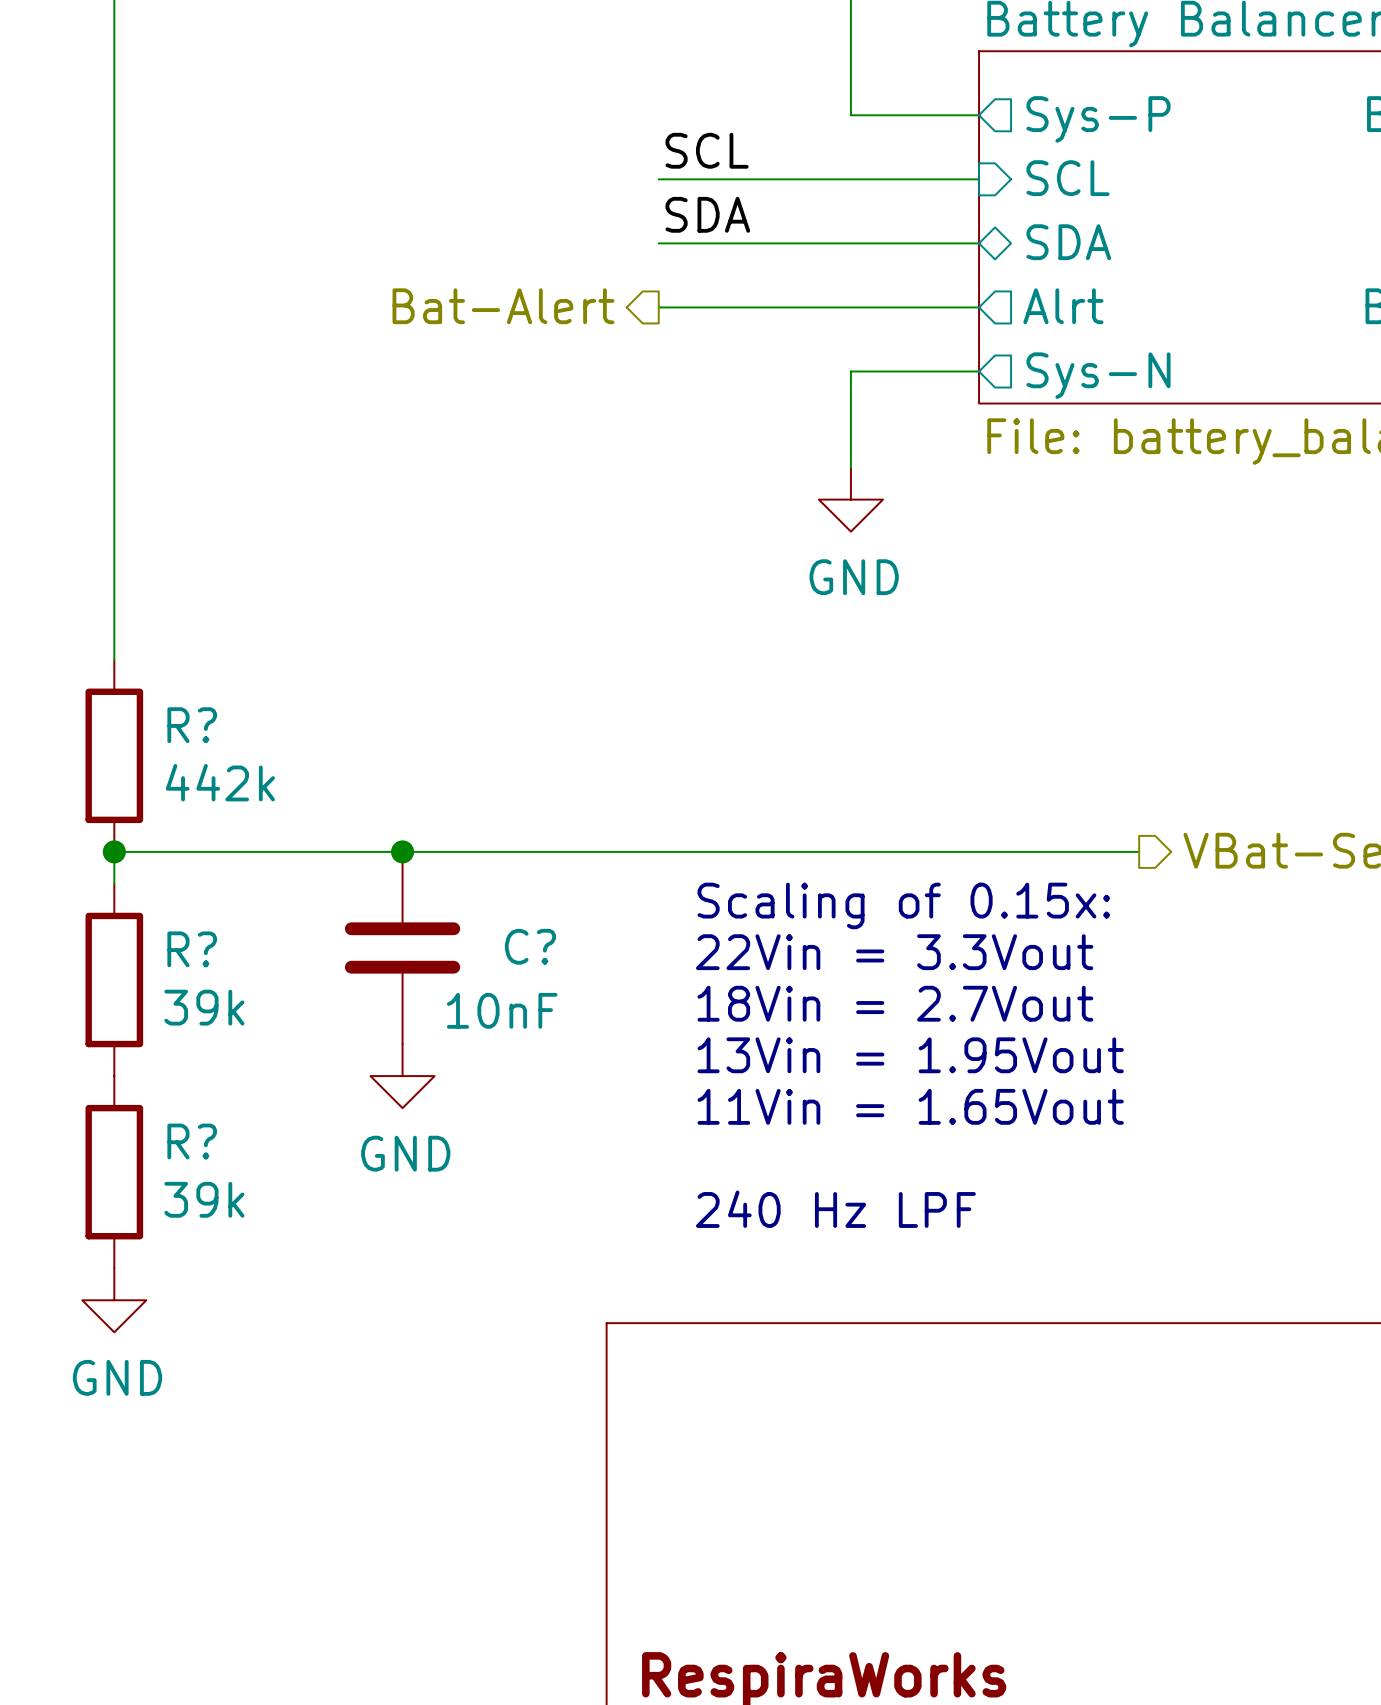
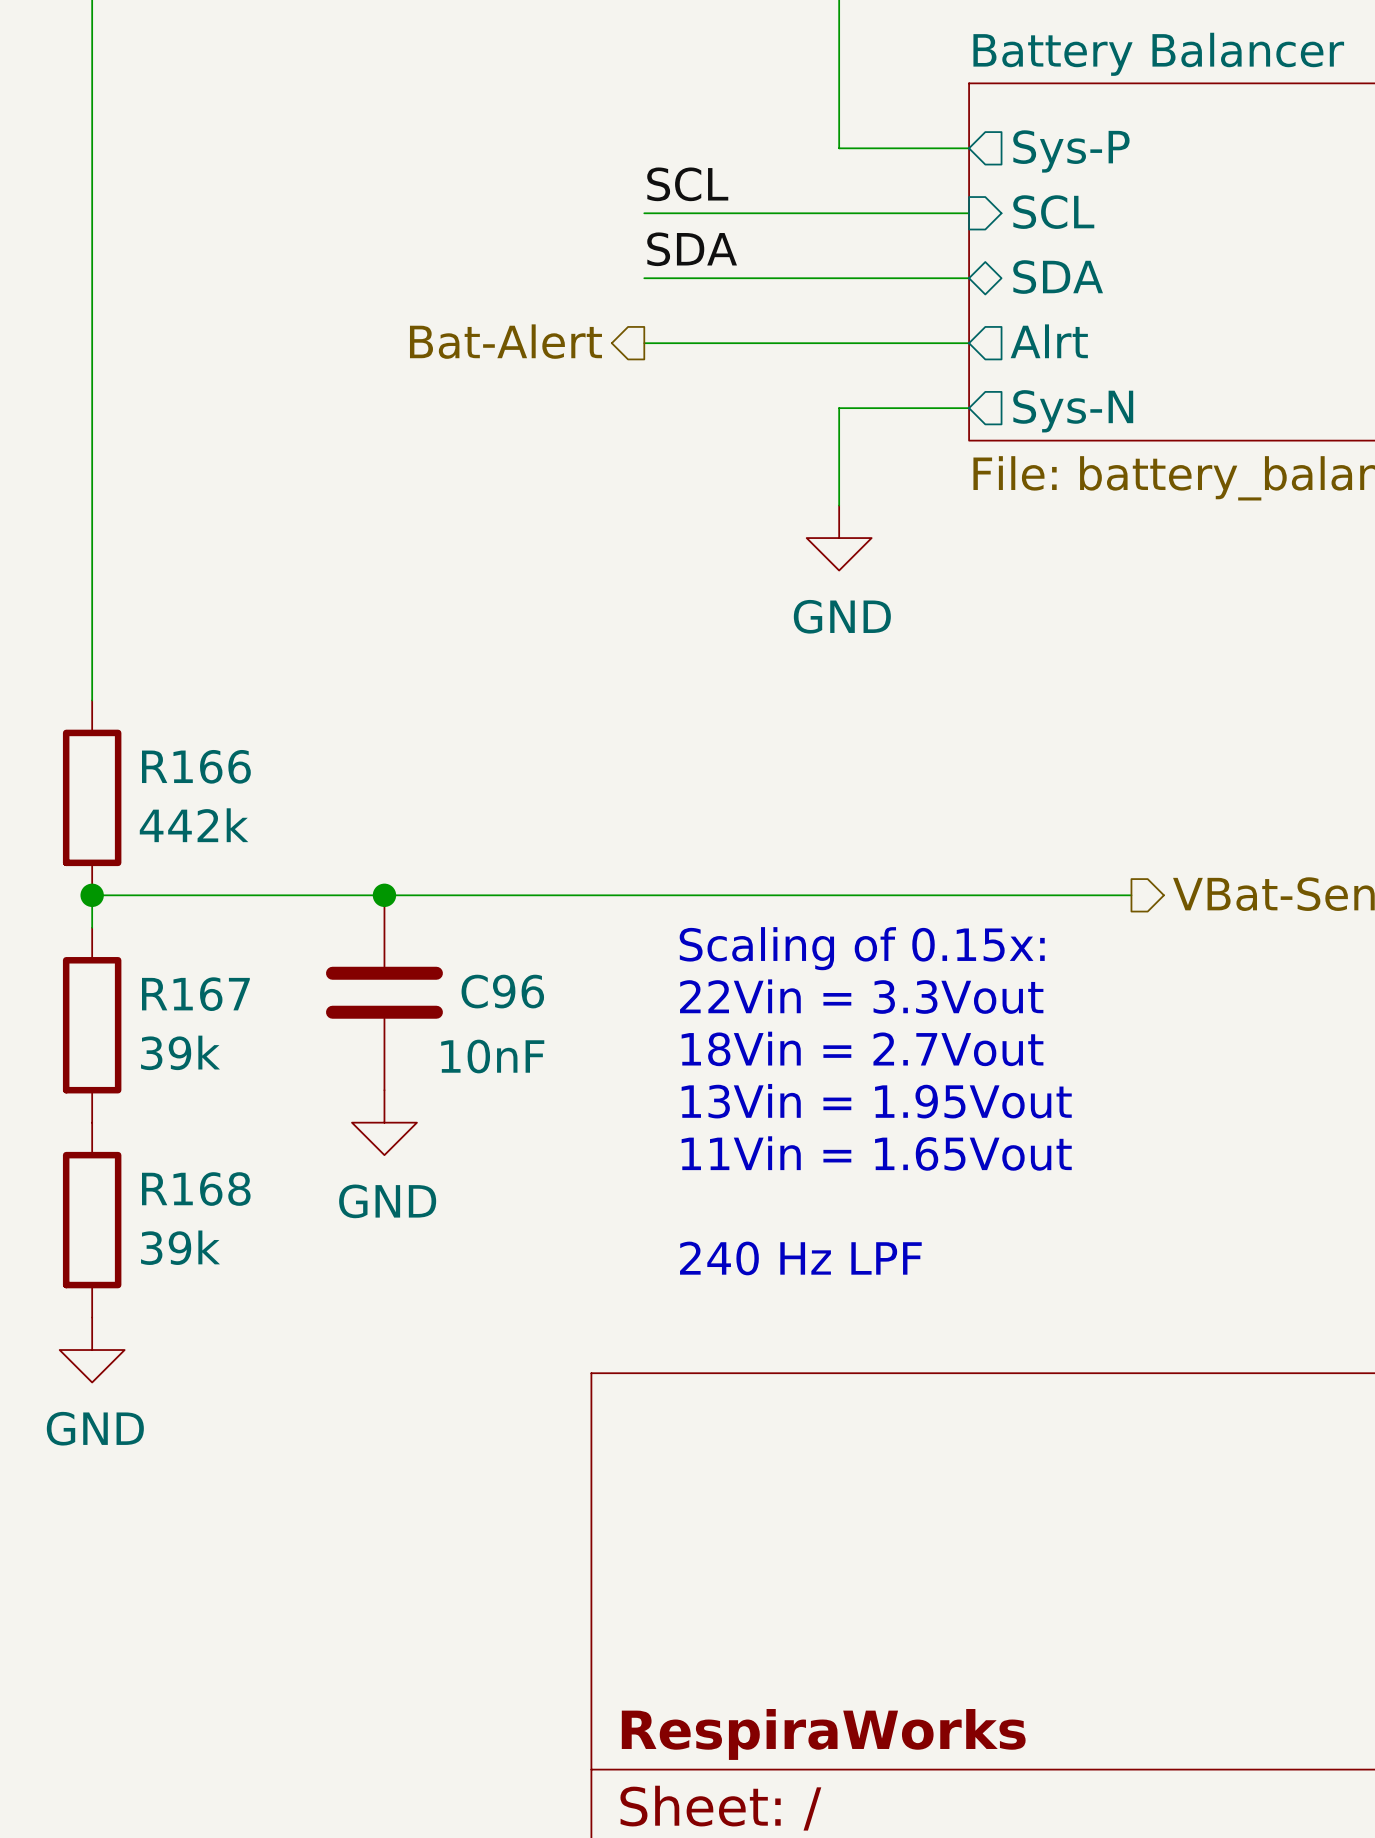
R? name: R? (192, 725) -> R166 (196, 766)
C? name: C? (530, 946) -> C96 (502, 991)
R? name: R? (192, 949) -> R167 (195, 994)
R? name: R? (192, 1141) -> R168 (196, 1189)

